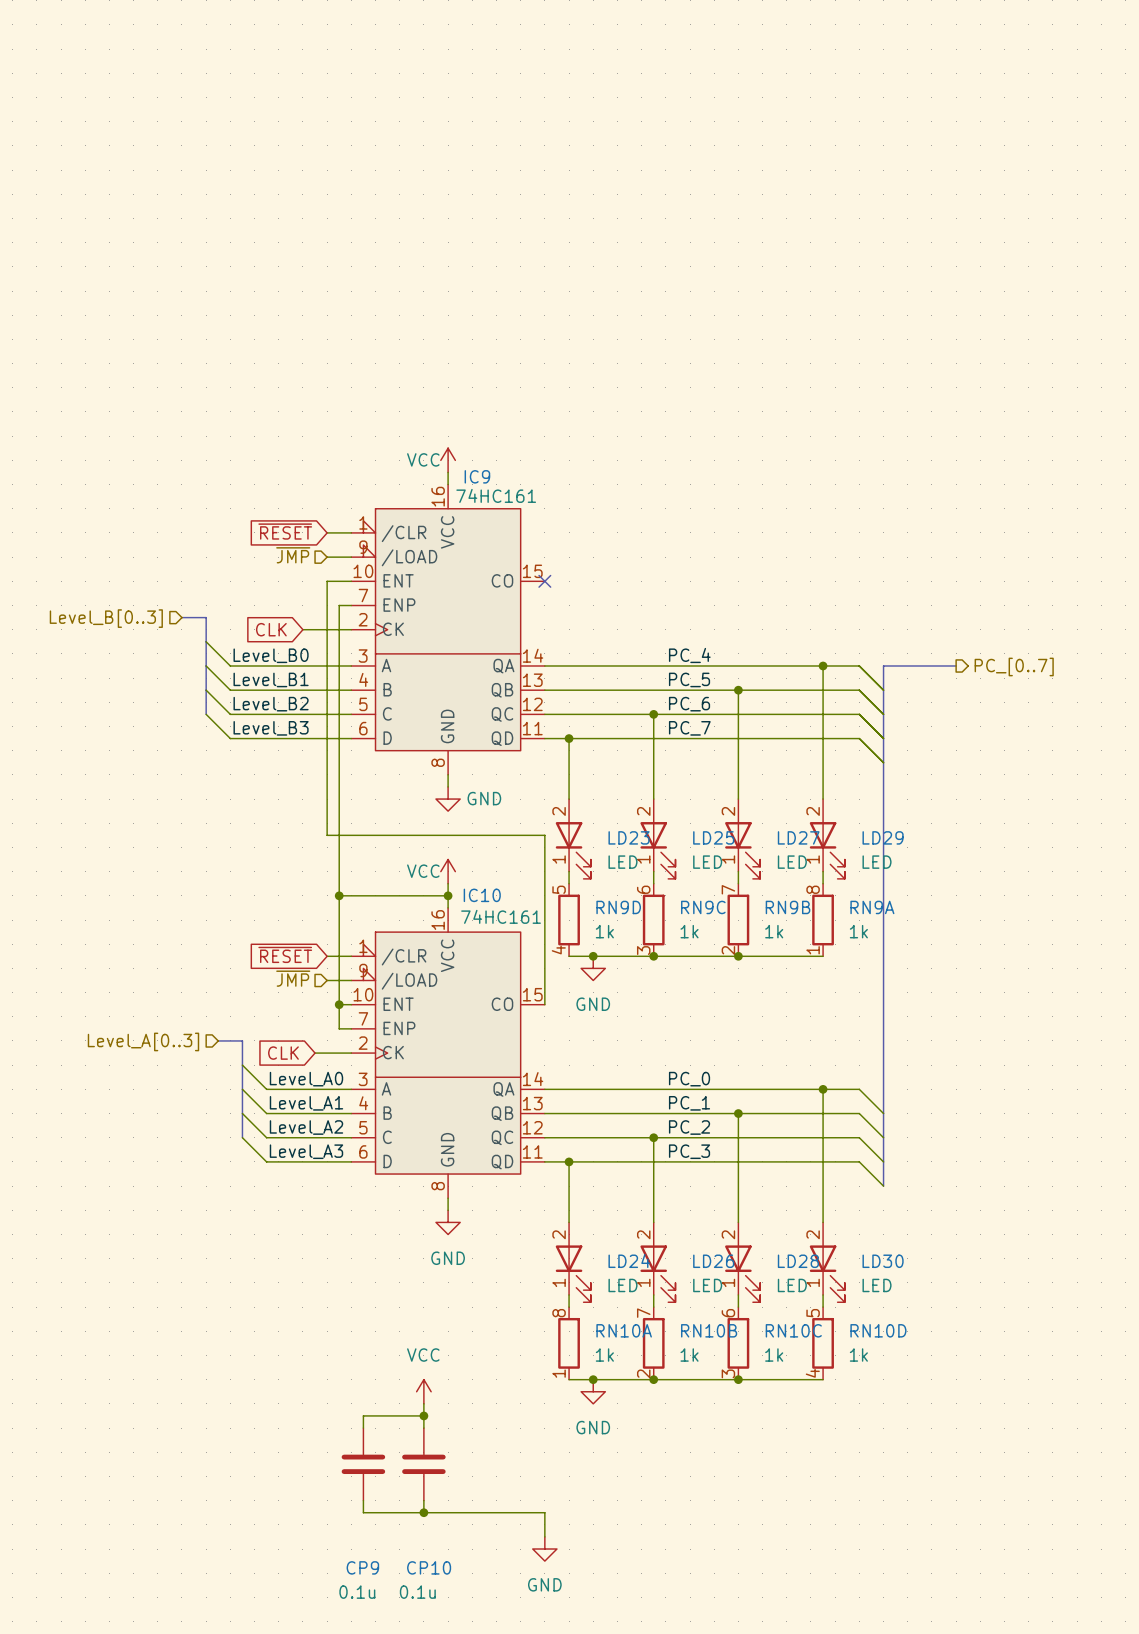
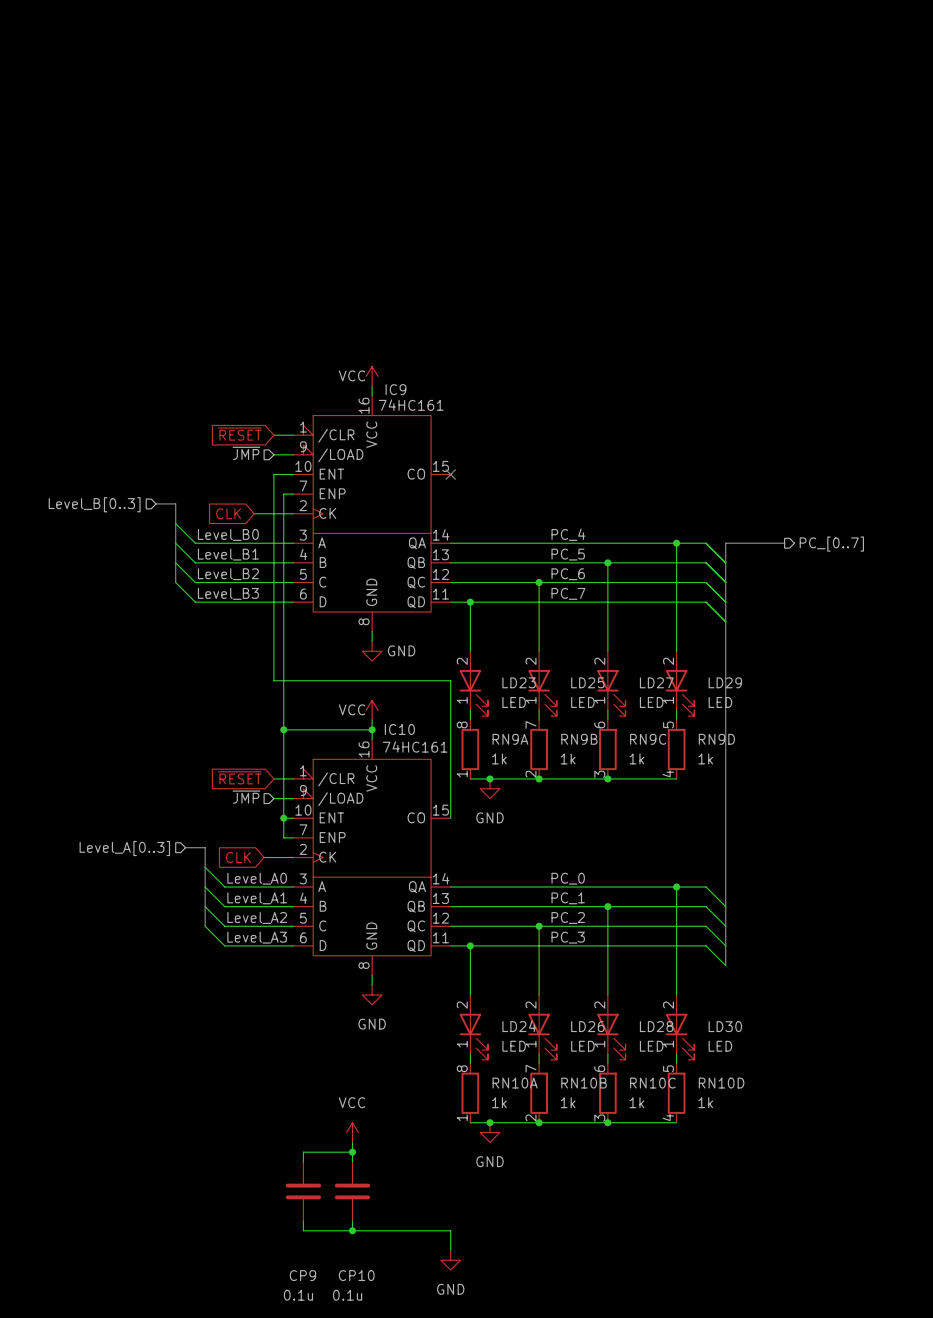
RN9D position: (569, 920) -> (676, 749)
RN9C position: (653, 920) -> (607, 749)
RN9B position: (738, 920) -> (539, 749)
RN9A position: (823, 920) -> (470, 749)

